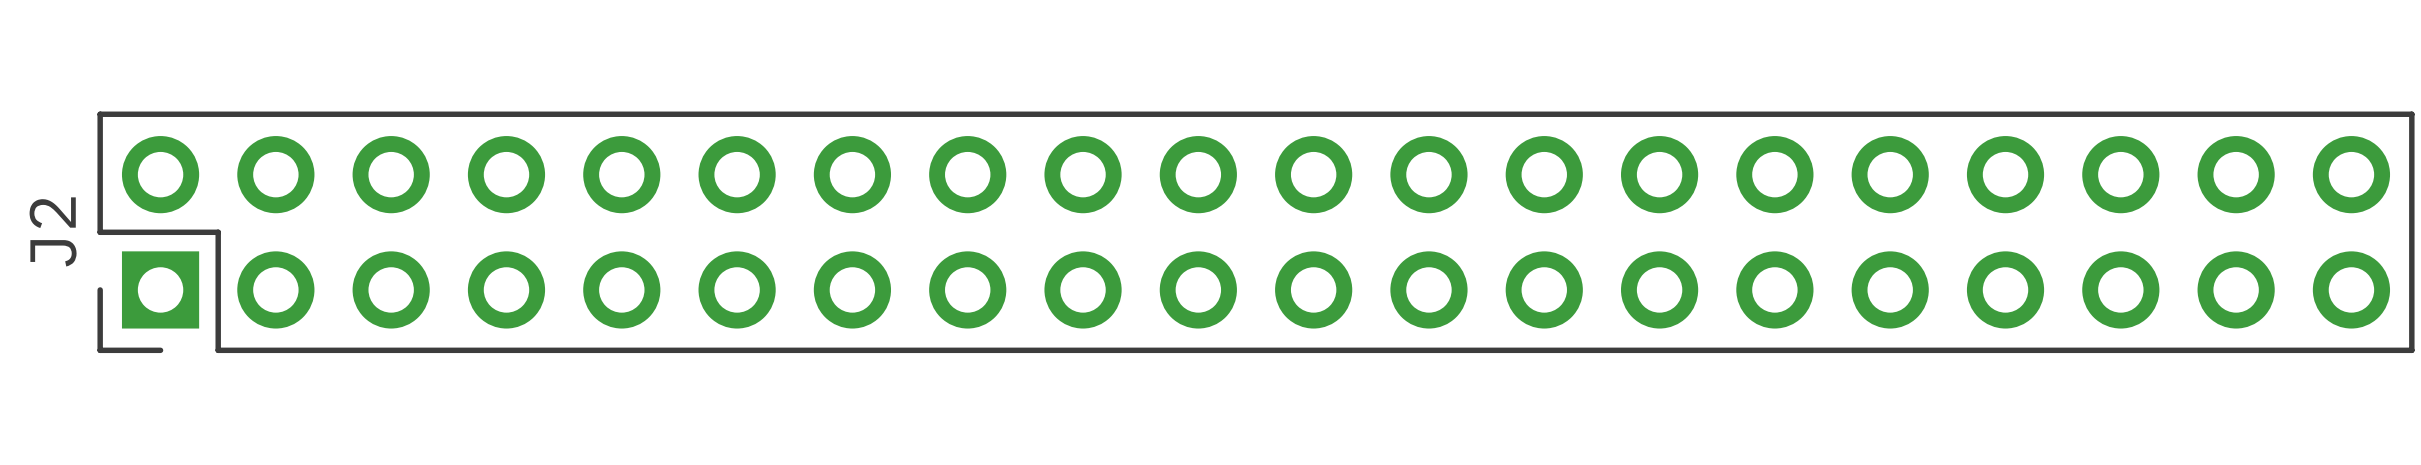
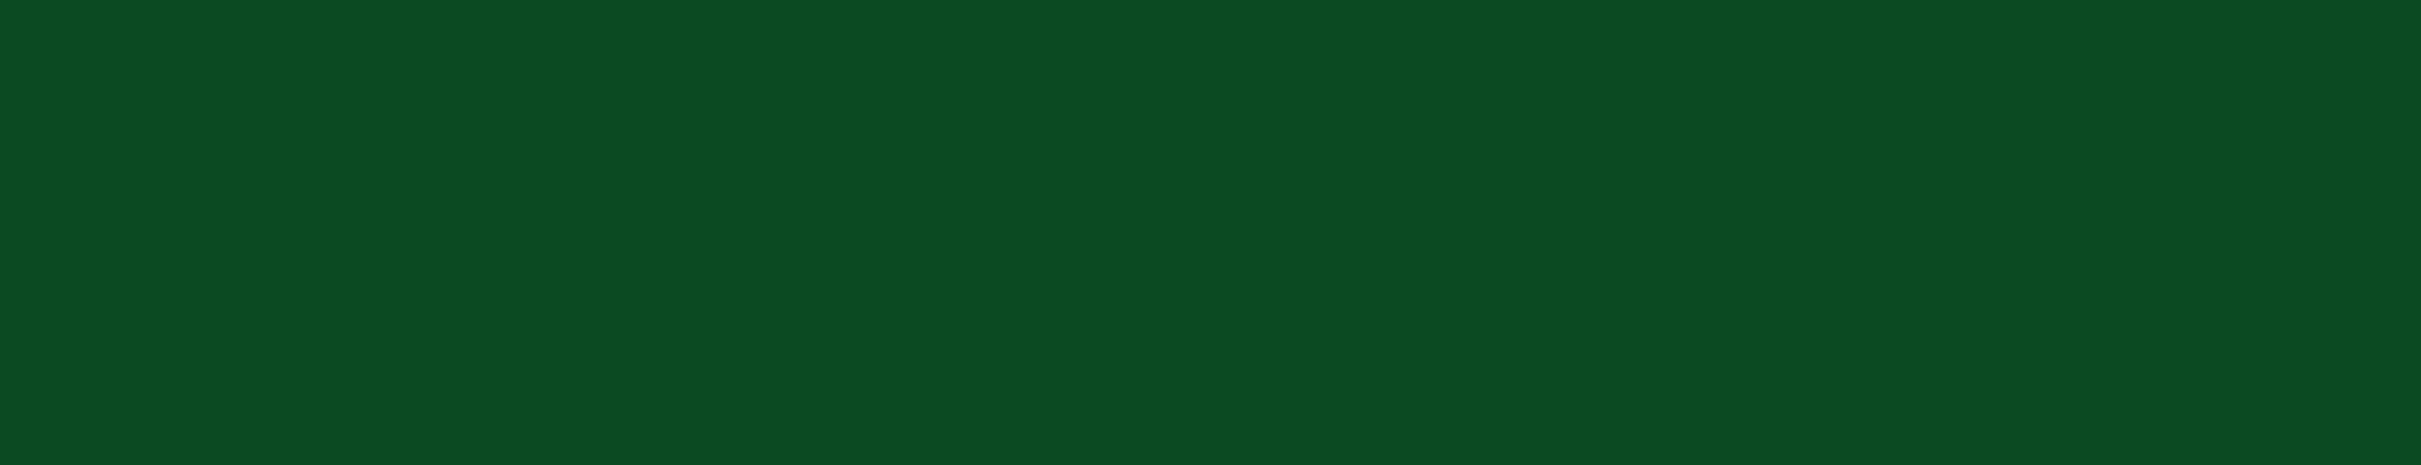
J2: (1256, 232) -> none

